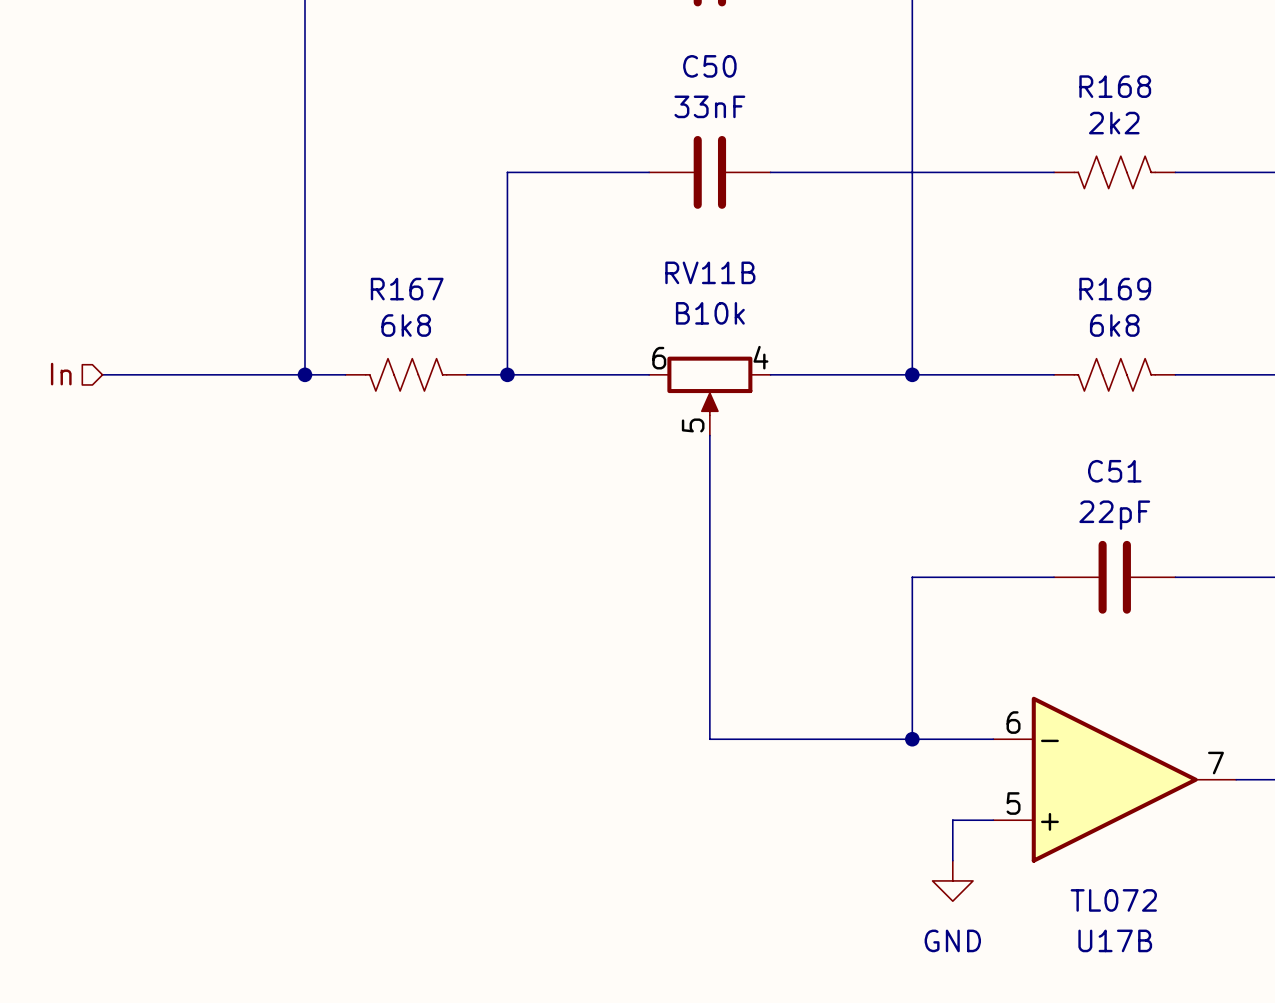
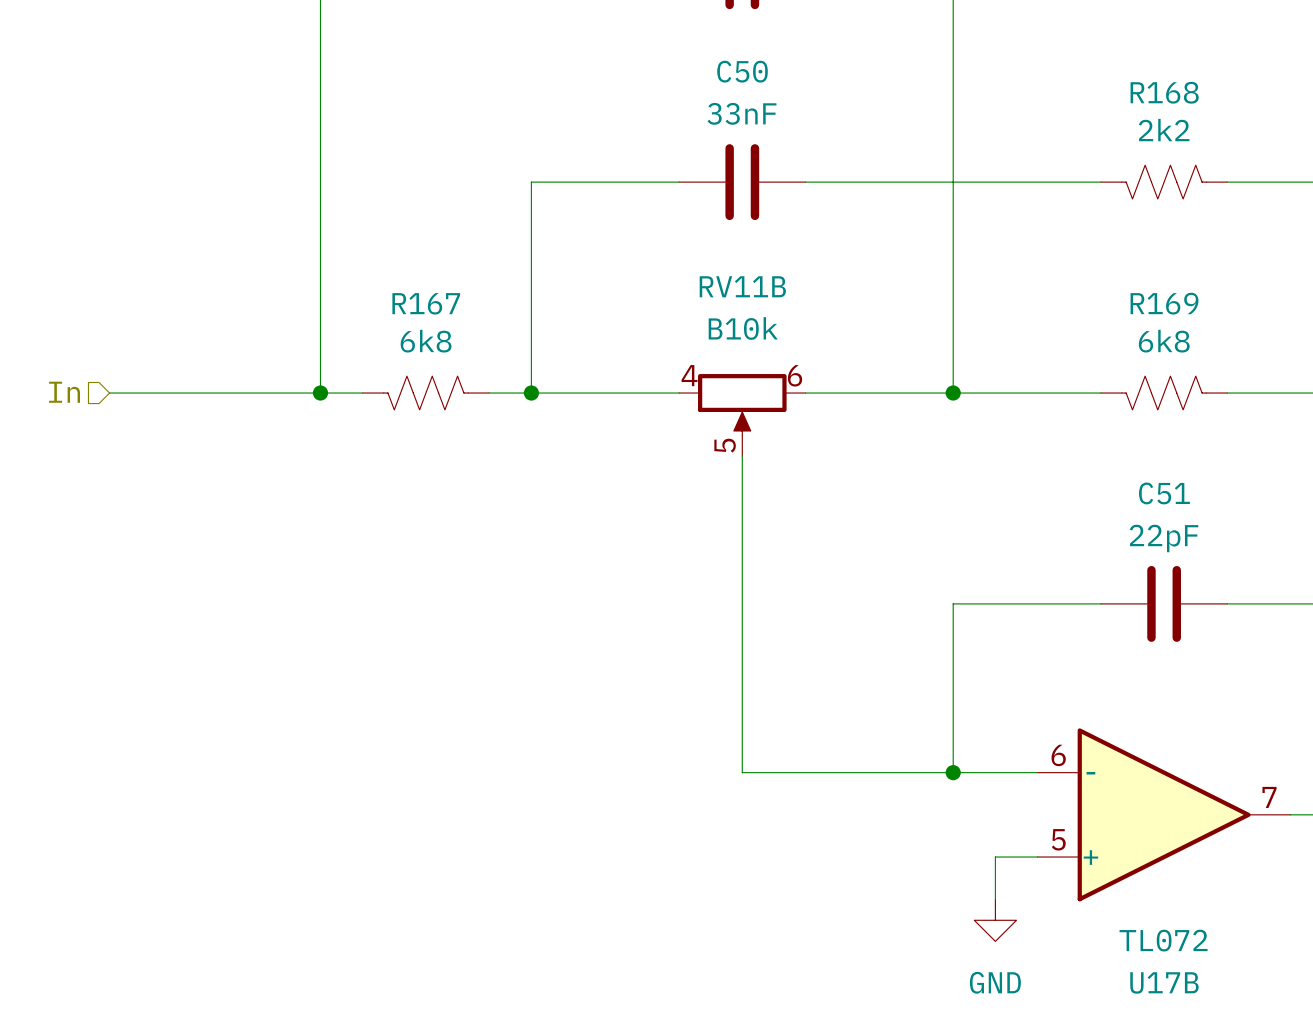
RV11B flip: as is (709, 385) -> left-right (742, 404)

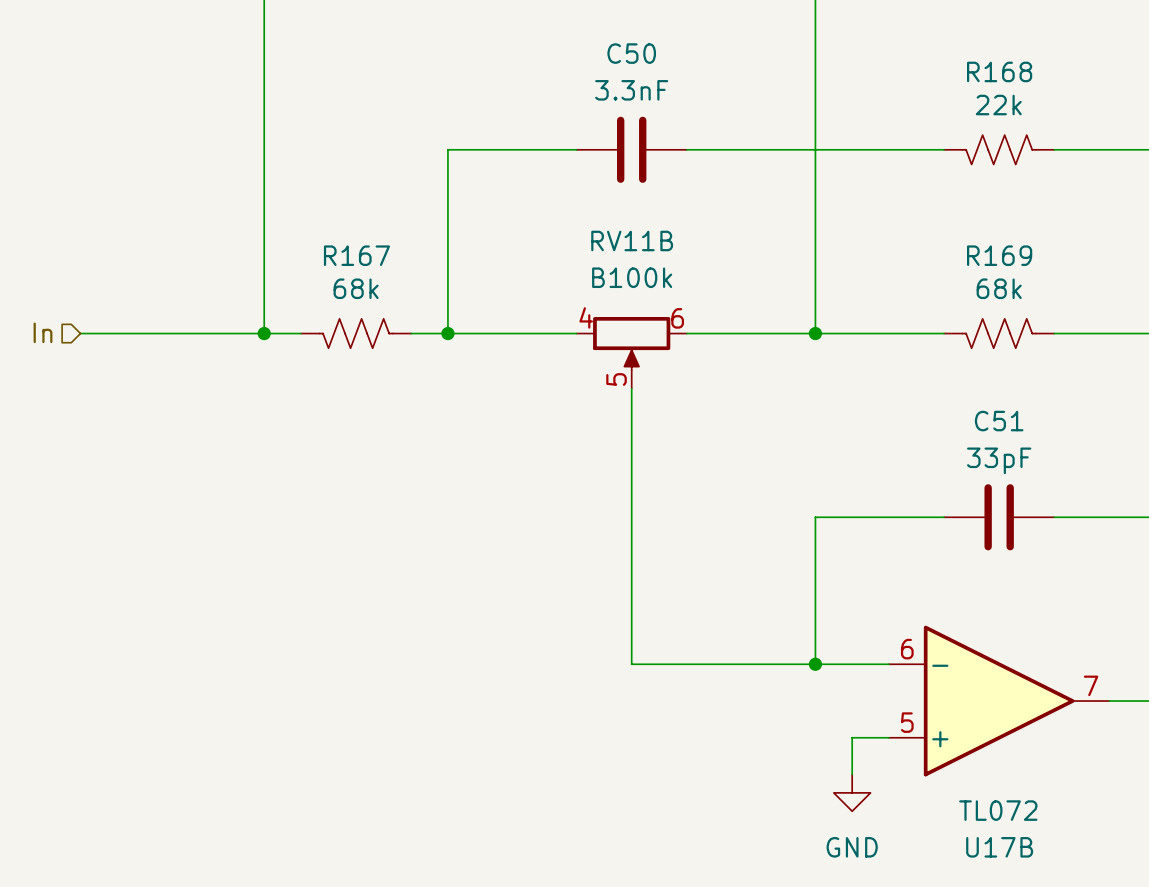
C50 value: 33nF (741, 113) -> 3.3nF (631, 90)
R168 value: 2k2 (1164, 130) -> 22k (998, 105)
RV11B value: B10k (743, 328) -> B100k (632, 277)
R167 value: 6k8 (426, 341) -> 68k (356, 288)
R169 value: 6k8 (1164, 341) -> 68k (999, 288)
C51 value: 22pF (1164, 538) -> 33pF (999, 460)

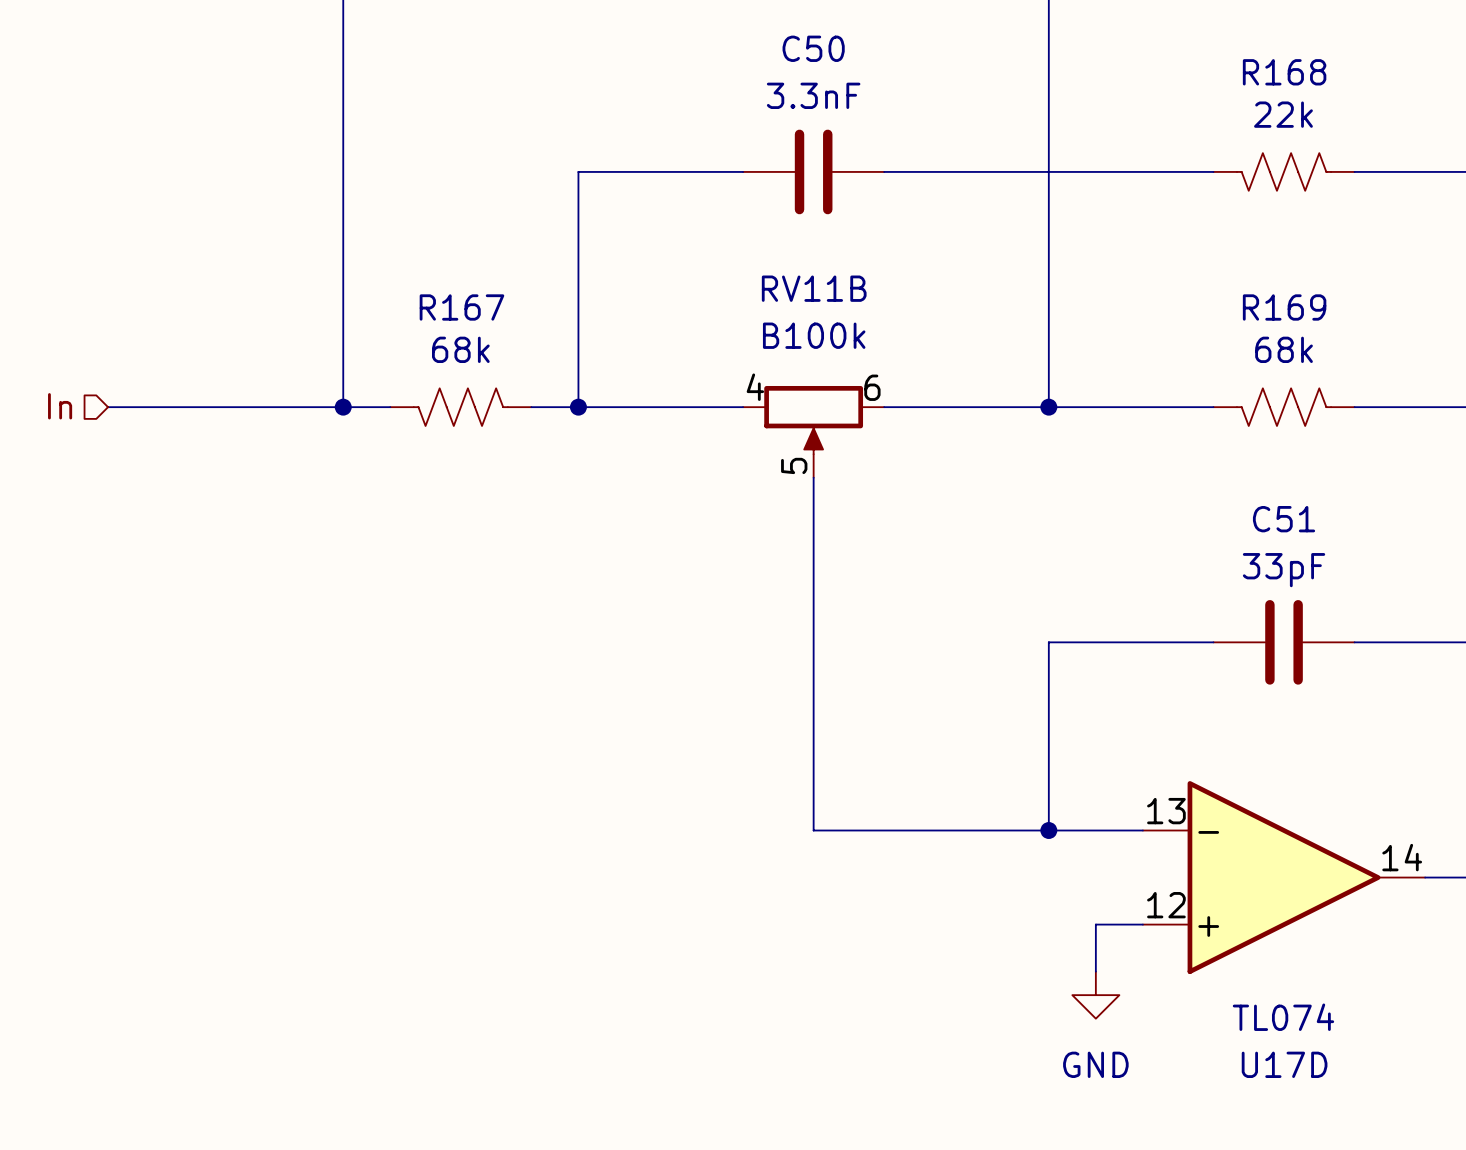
U17B pin number: 6 (907, 649) -> 13 (1166, 811)
U17B pin number: 7 (1091, 685) -> 14 (1402, 857)
U17B pin number: 5 (907, 722) -> 12 (1166, 905)
U17B value: TL072 (998, 810) -> TL074 (1283, 1017)
U17B name: U17B (999, 847) -> U17D (1284, 1064)

